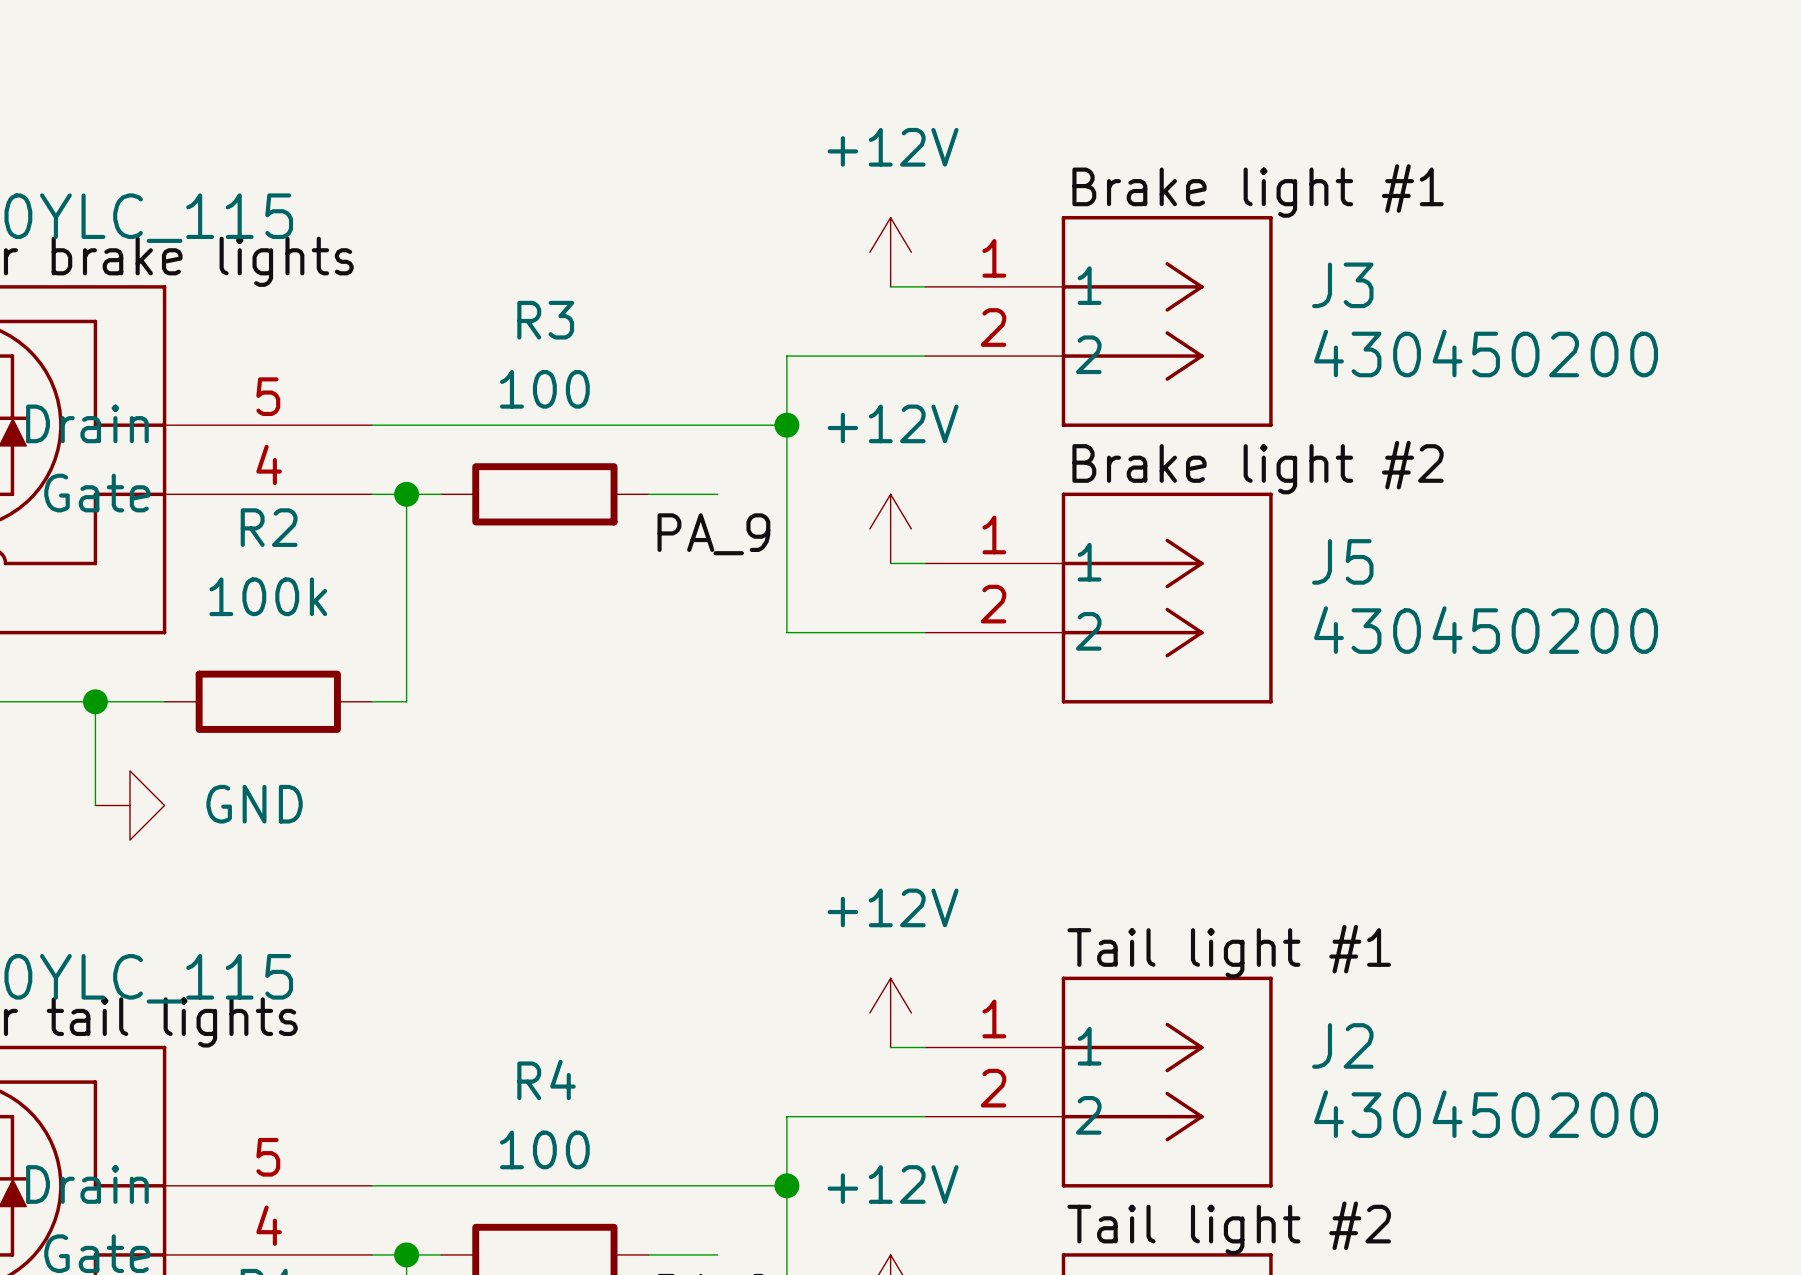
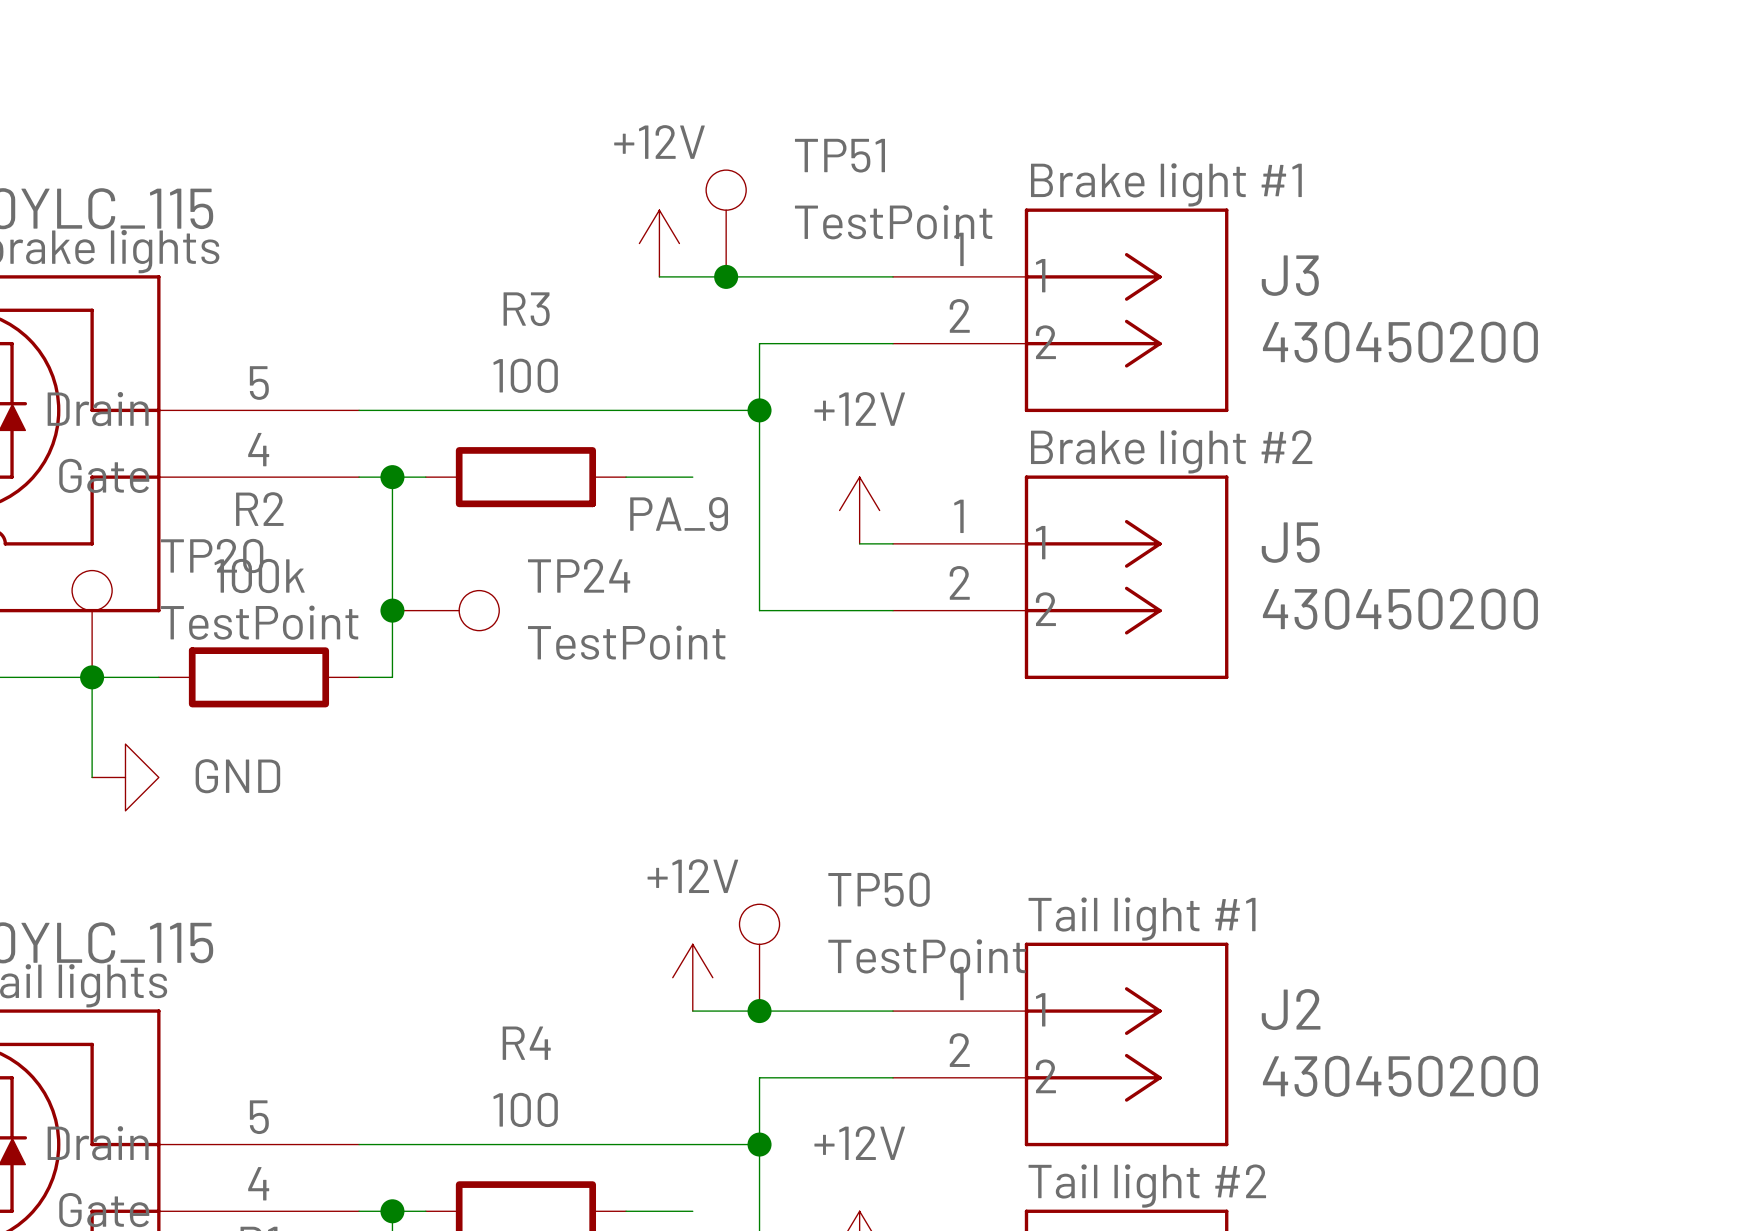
TP51: none -> TestPoint (726, 223)
power symbol position: +12V (890, 252) -> +12V (659, 243)
wire: none -> (659, 276) (859, 276)
junction: none -> (726, 276)
junction: none -> (392, 610)
TP24: none -> TestPoint (445, 610)
TP20: none -> TestPoint (92, 623)
TP50: none -> TestPoint (759, 957)
power symbol position: +12V (890, 1012) -> +12V (692, 977)
wire: none -> (692, 1011) (859, 1011)
junction: none -> (759, 1011)

